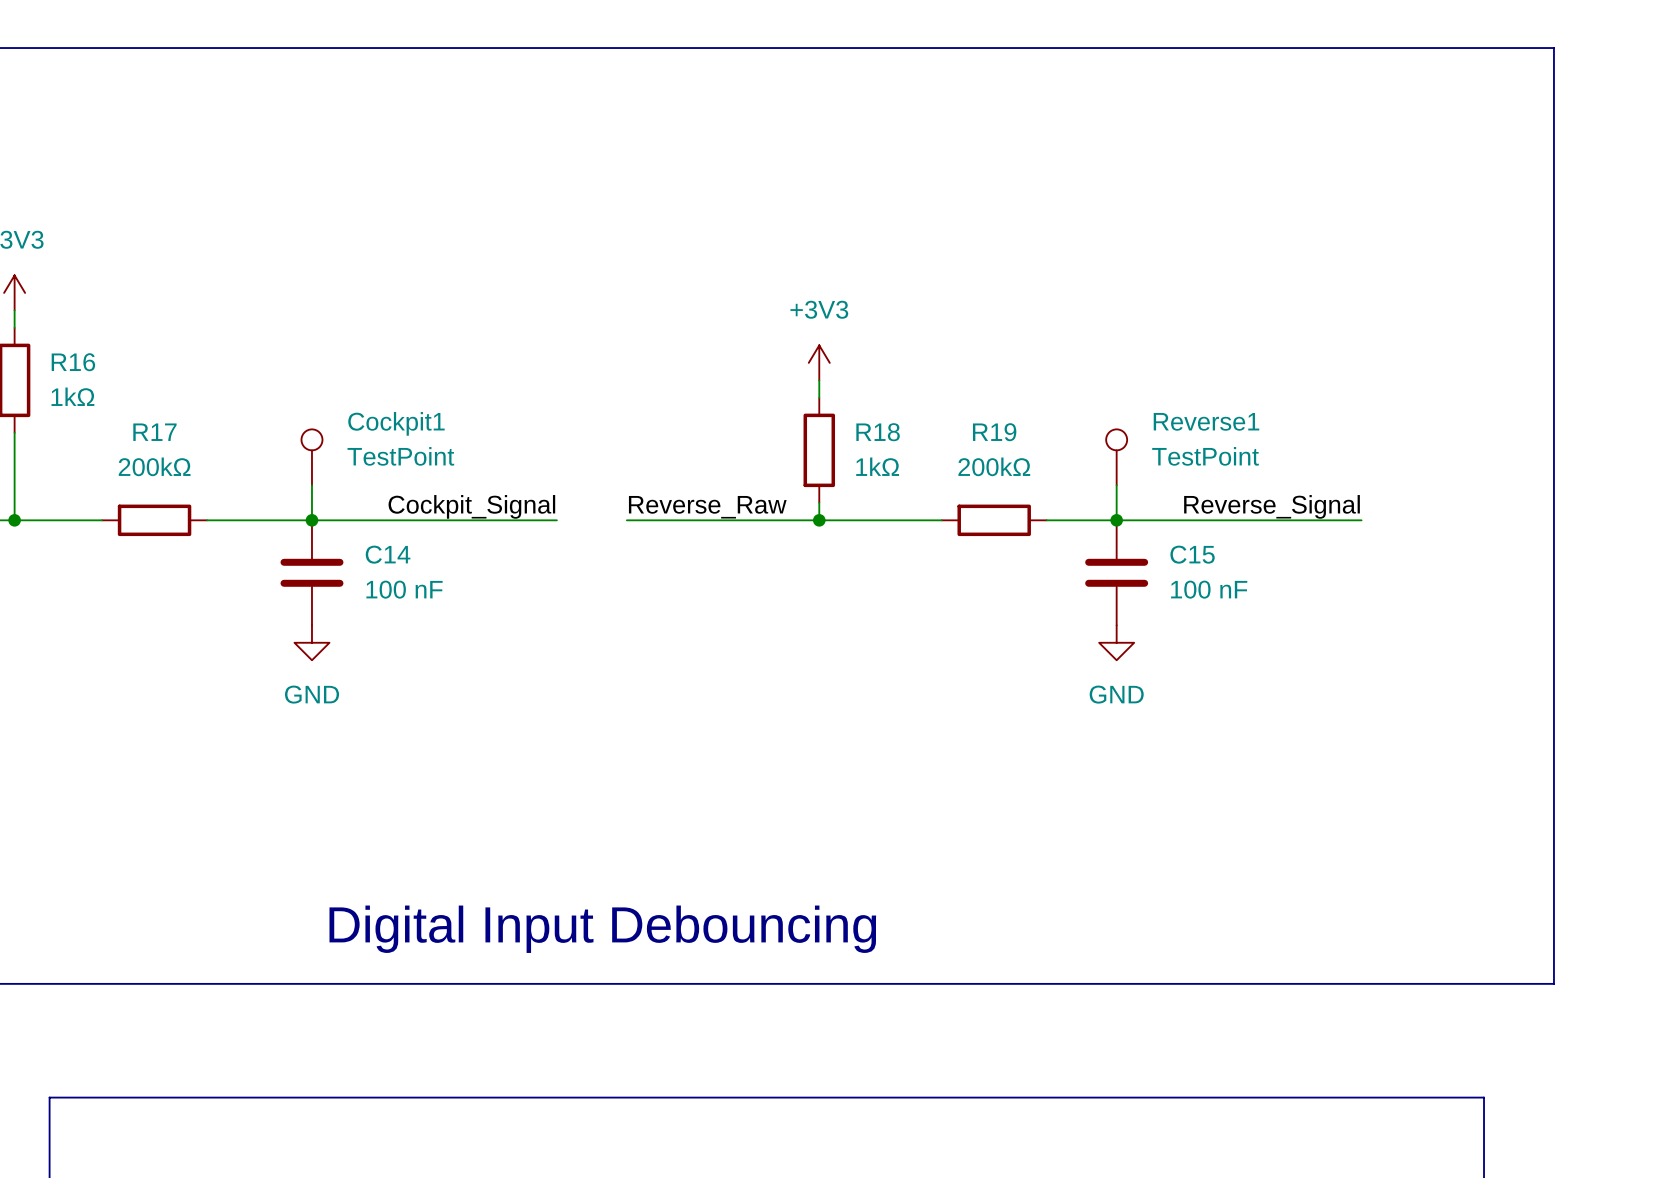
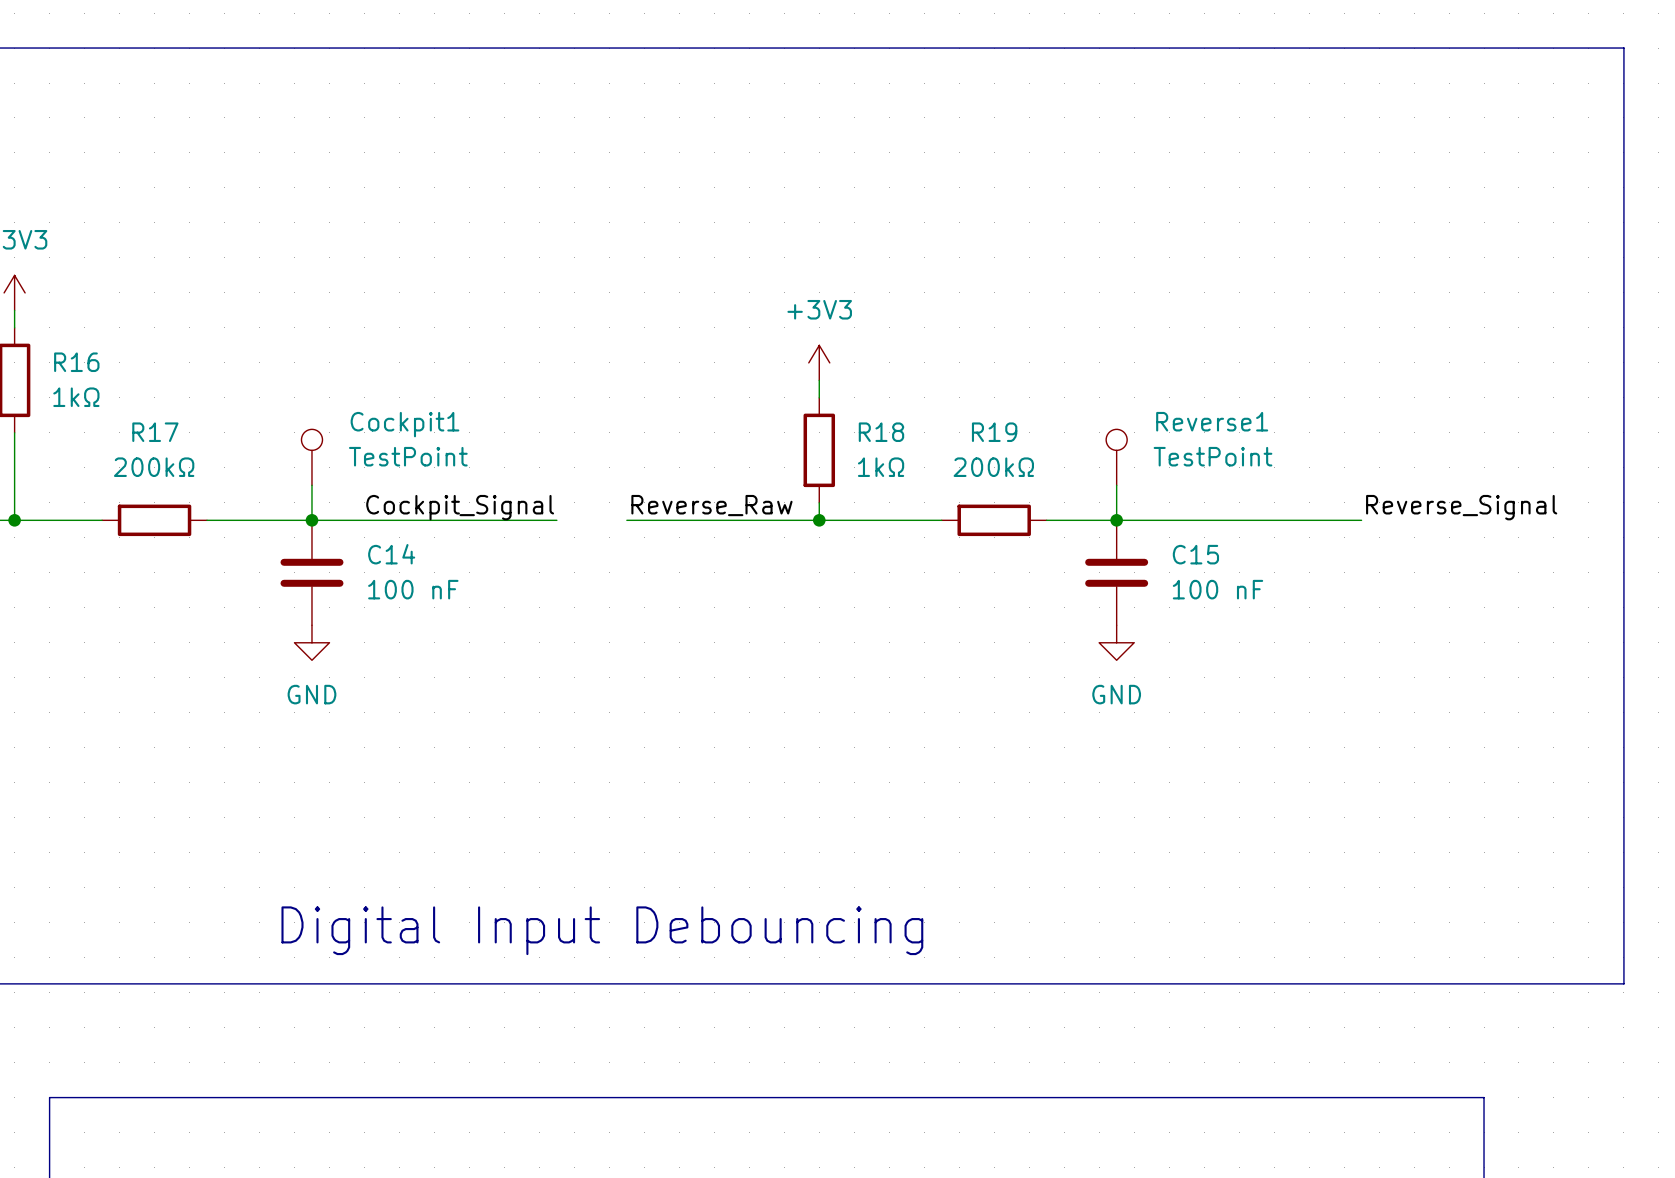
line: (1553, 48) (1553, 983) -> (1553, 48) (1623, 48) (1623, 983) (1553, 983)
label position: Reverse_Signal (1272, 506) -> Reverse_Signal (1461, 507)

